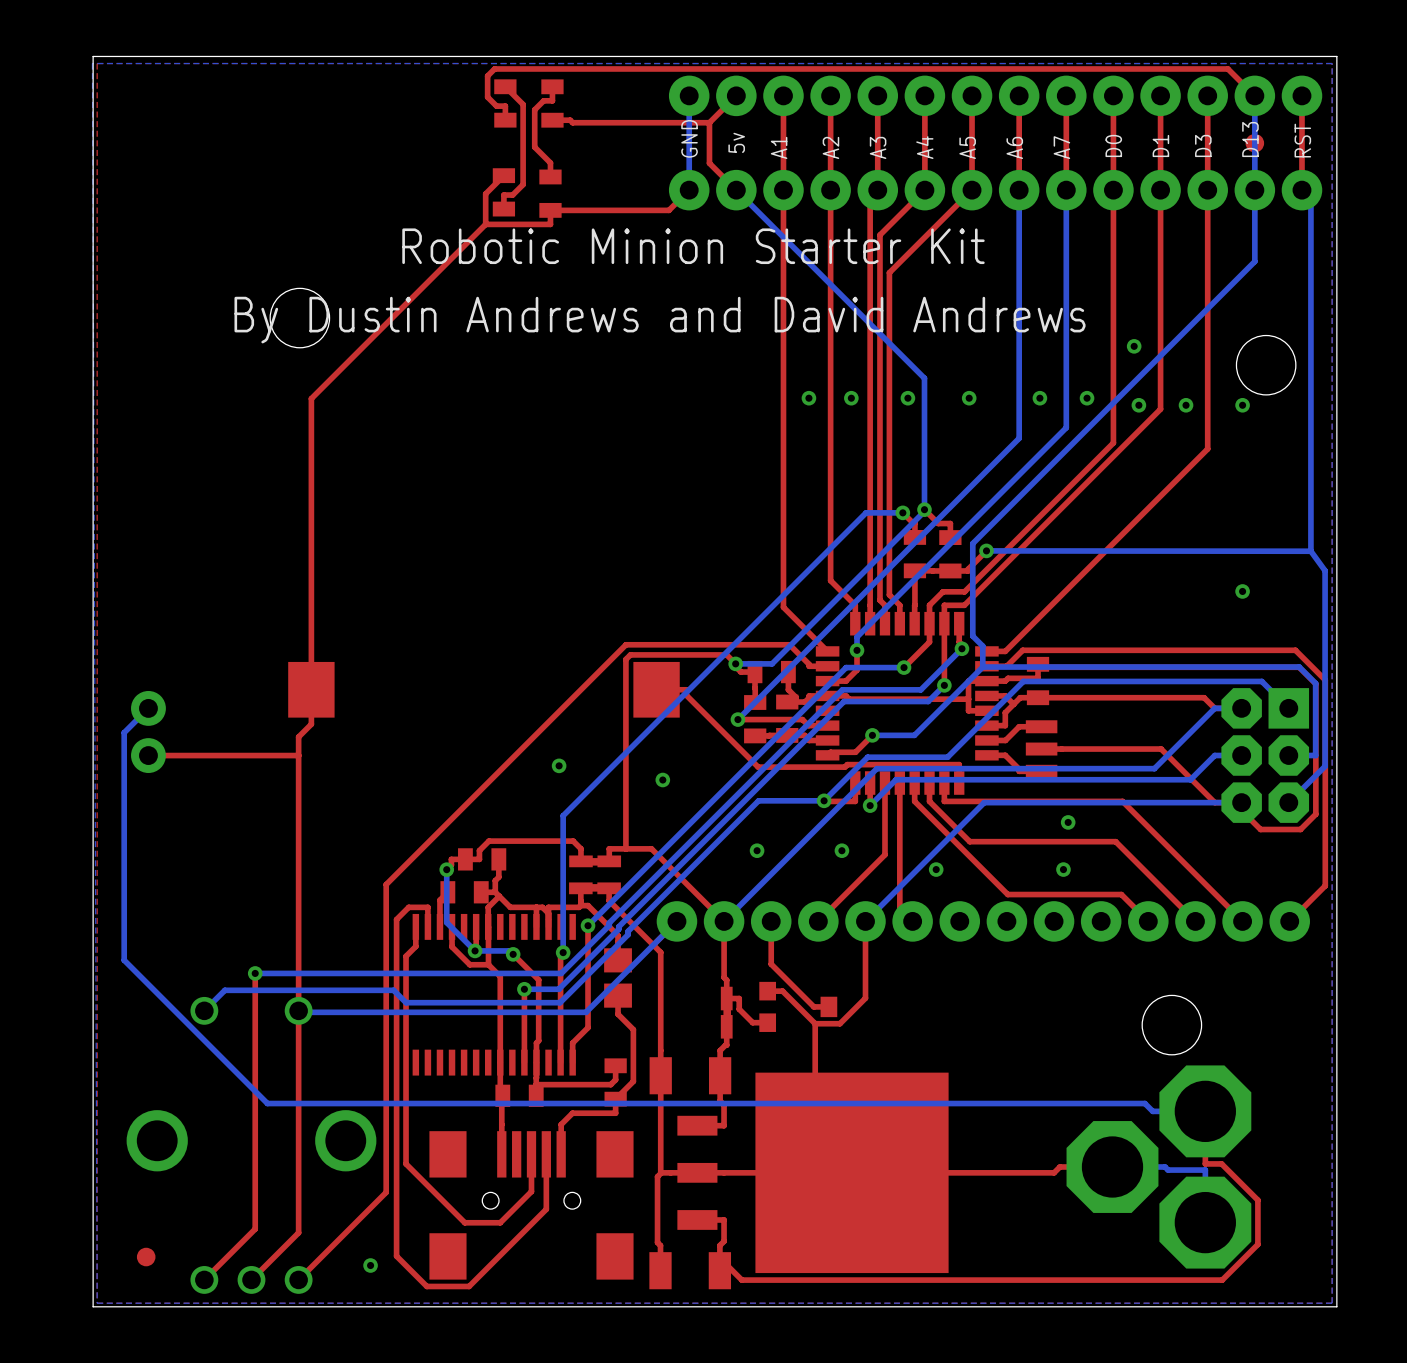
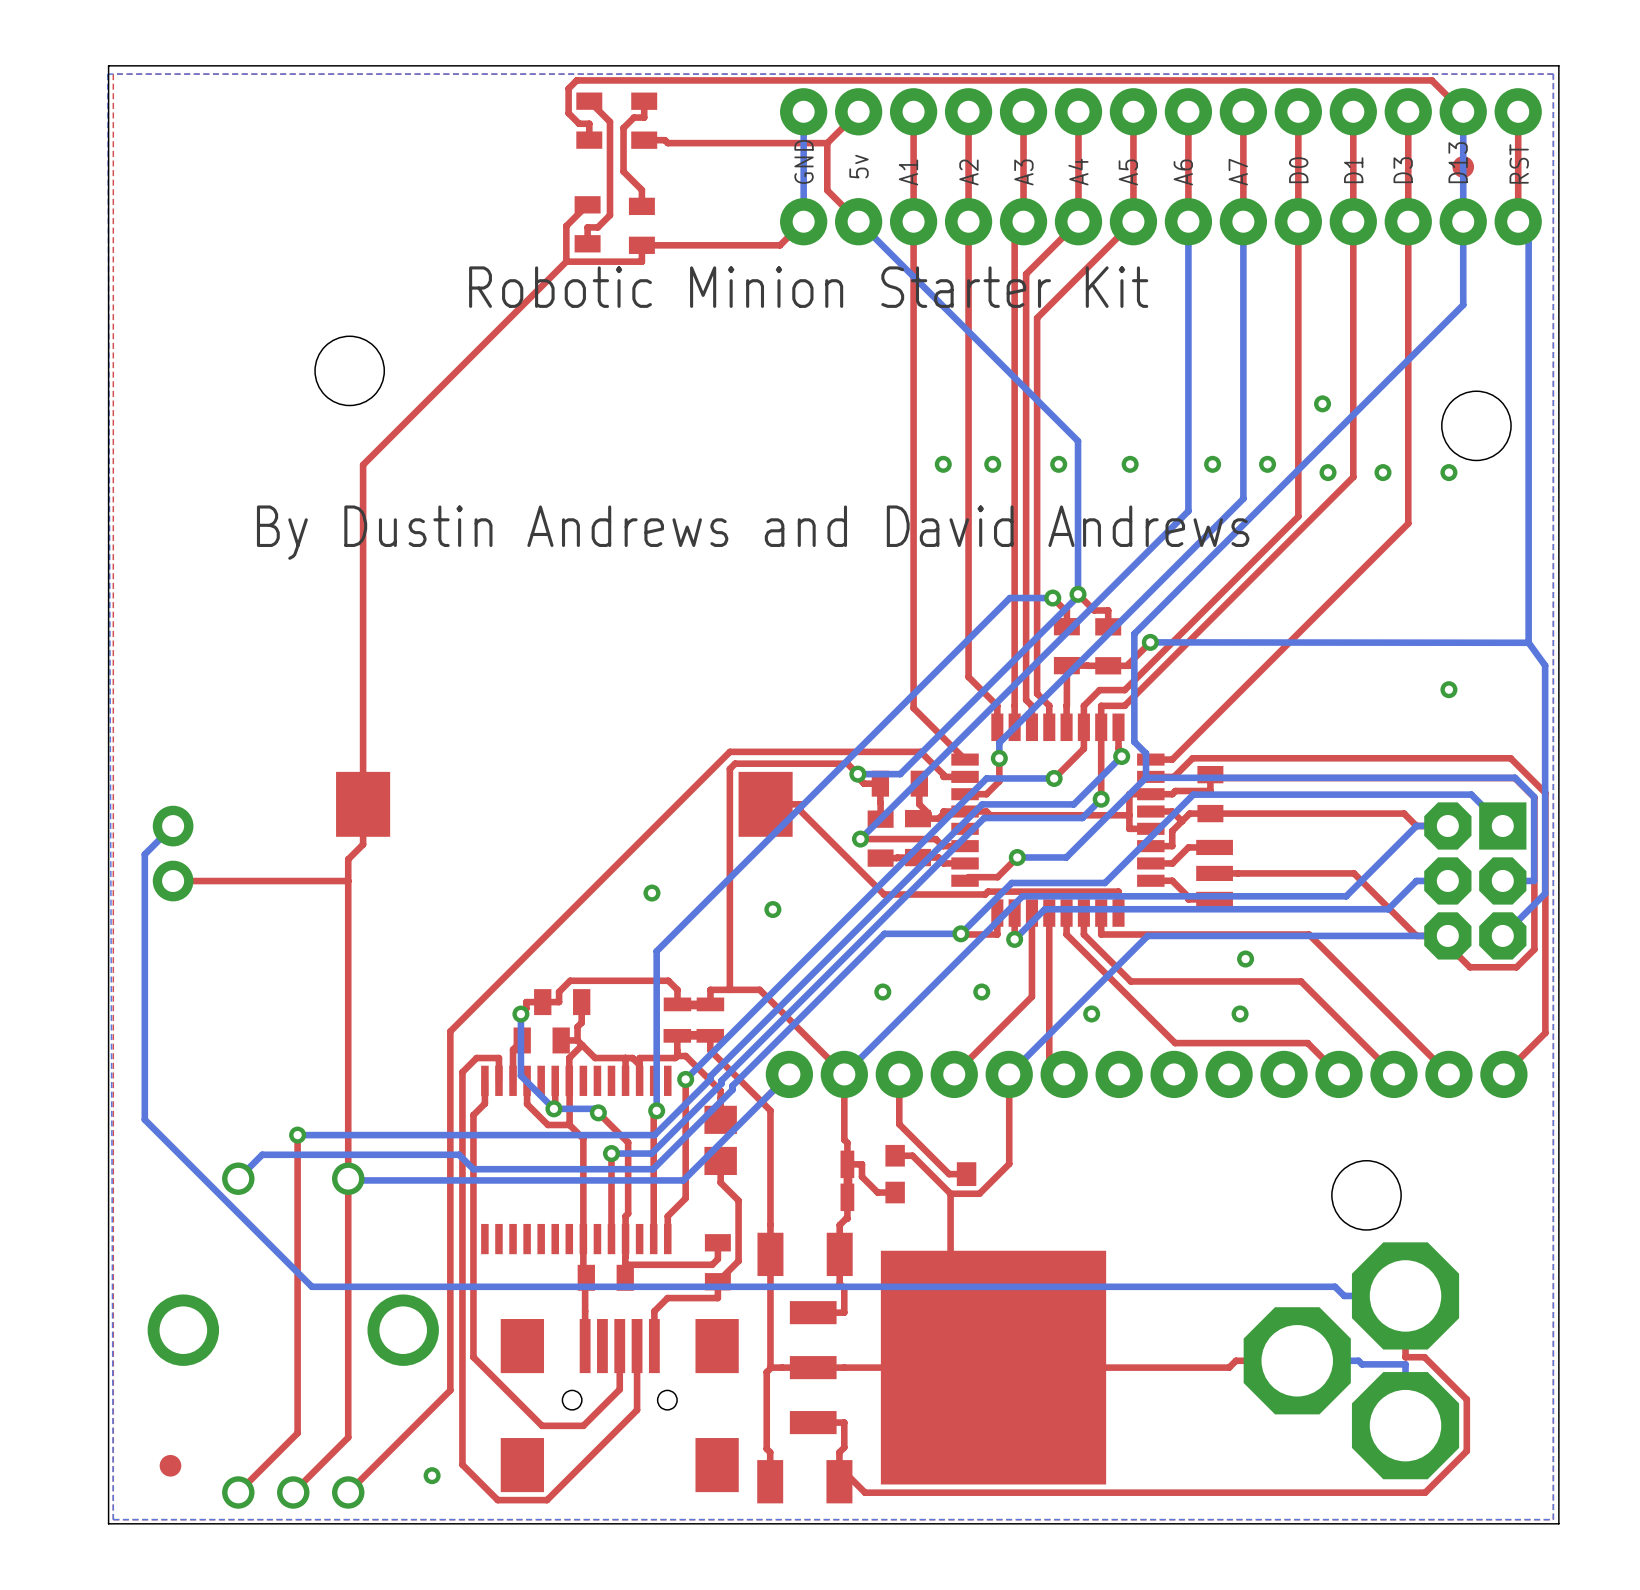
text position: By Dustin Andrews and David Andrews (660, 320) -> By Dustin Andrews and David Andrews (753, 532)

